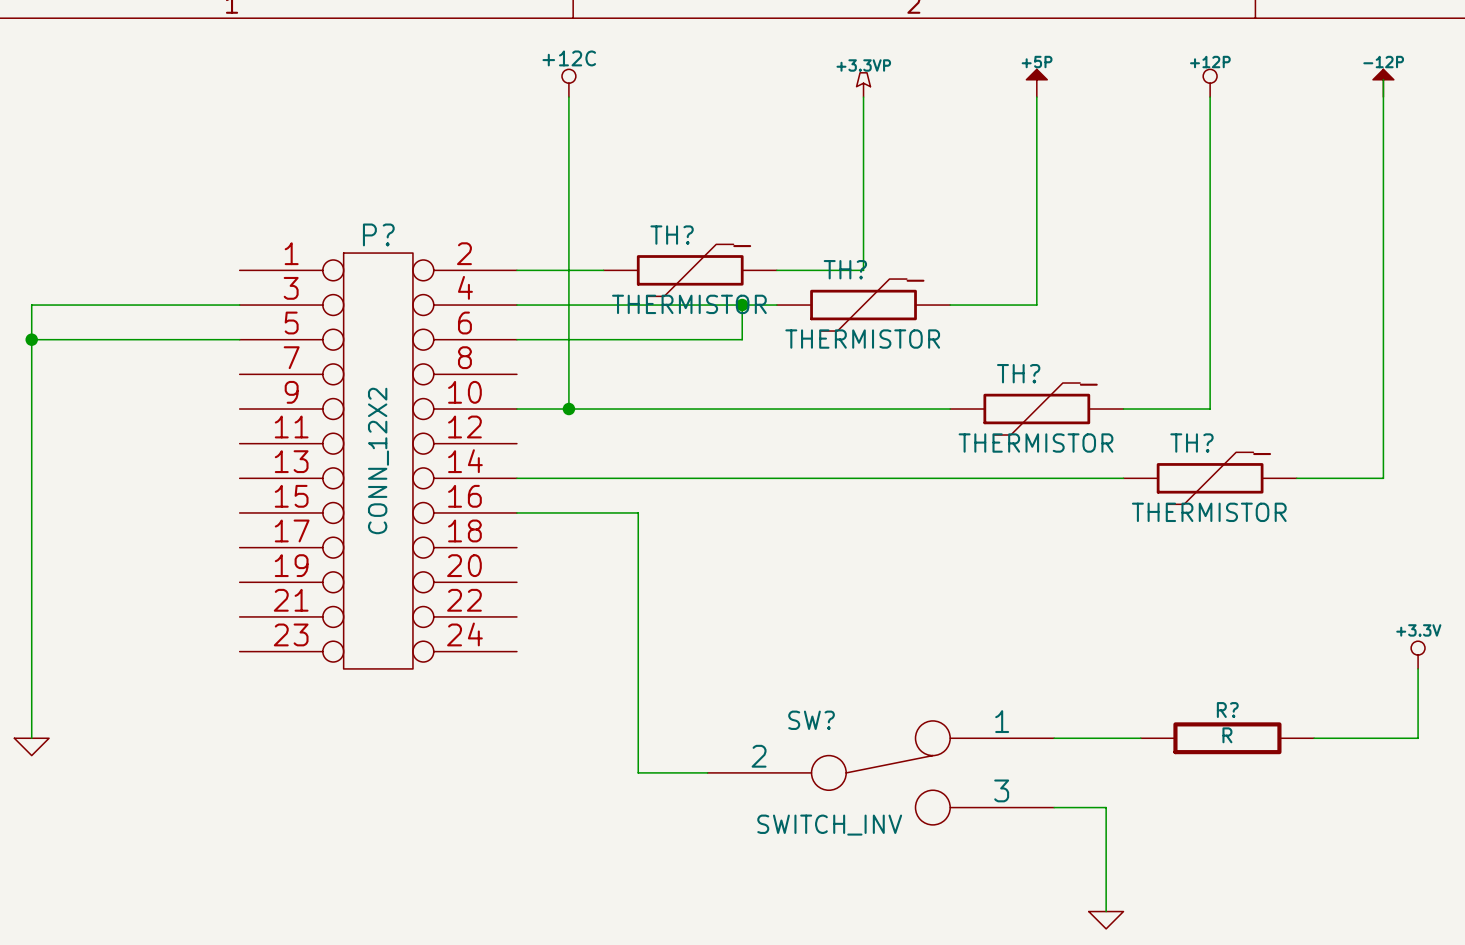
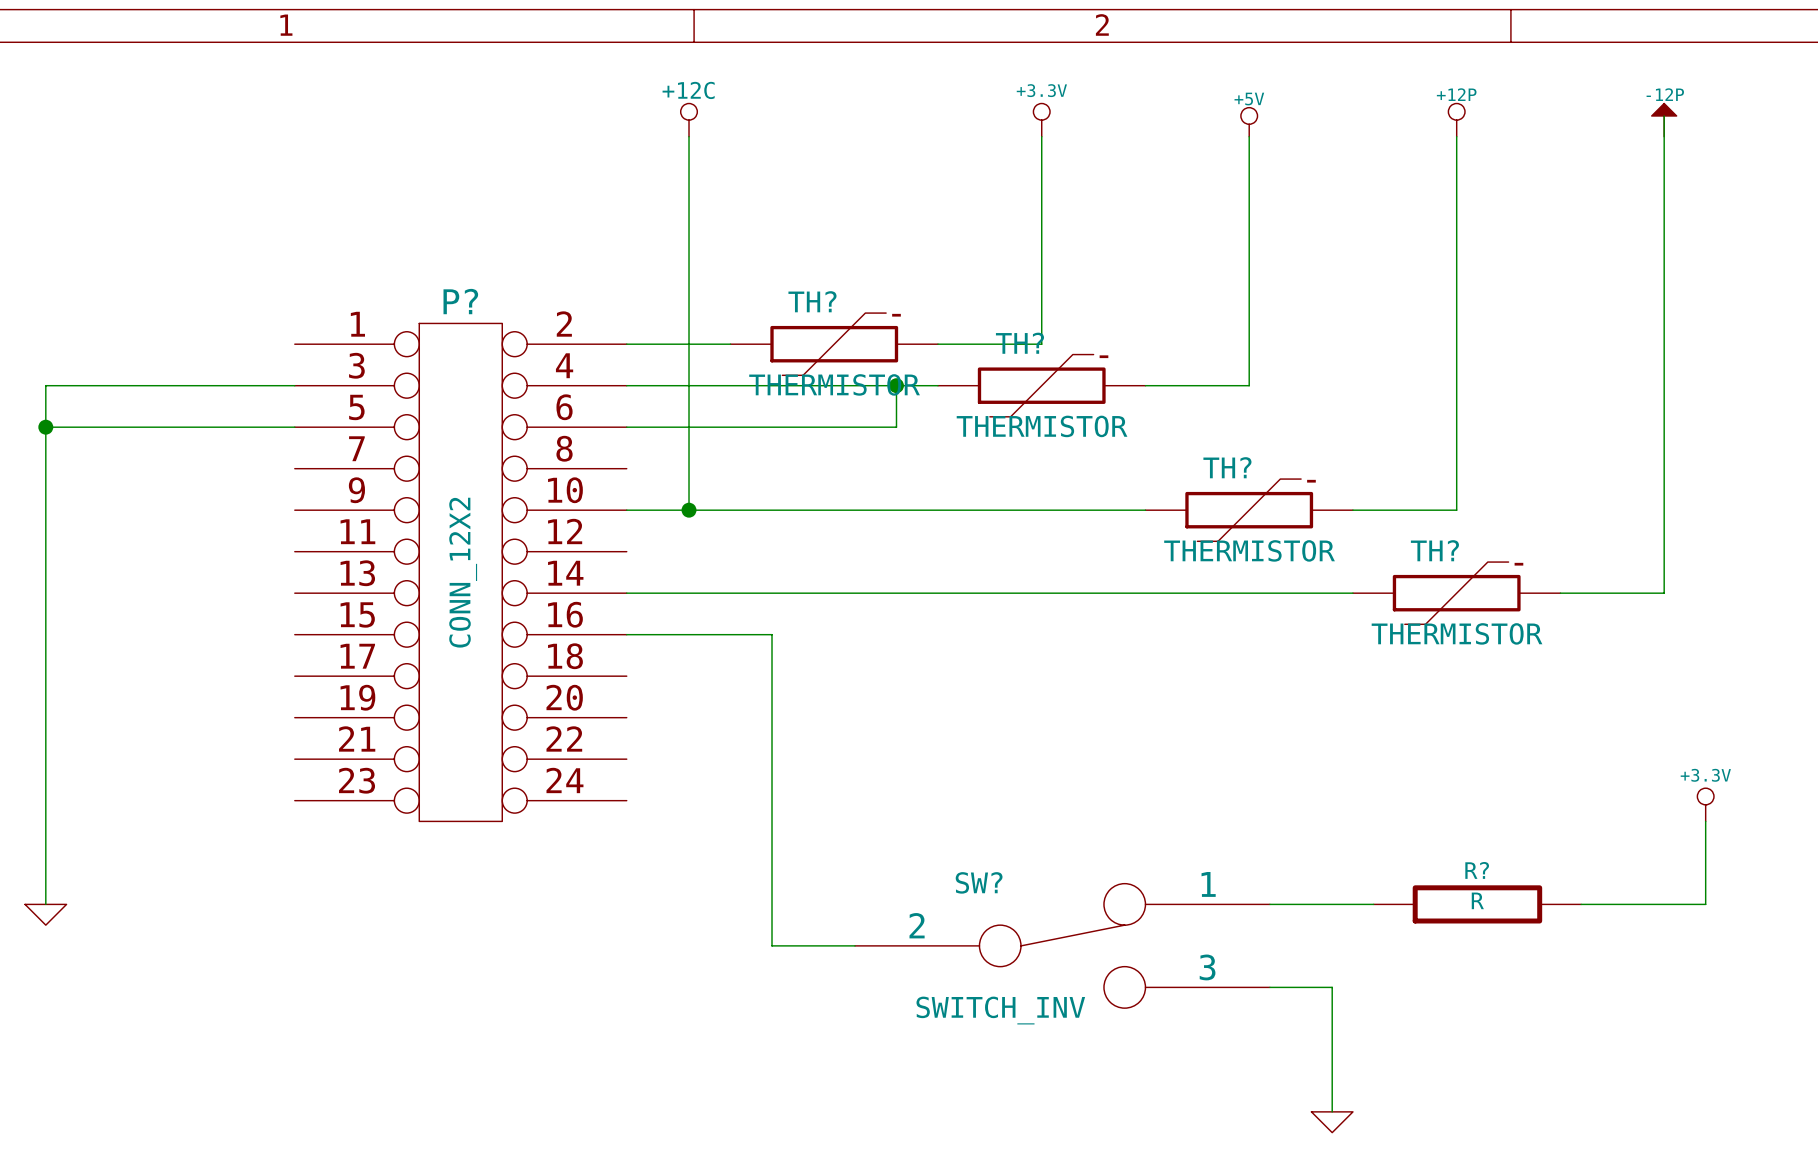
power symbol: +5P (1036, 83) -> +5V (1249, 122)
power symbol: +3.3VP (863, 84) -> +3.3V (1041, 120)

